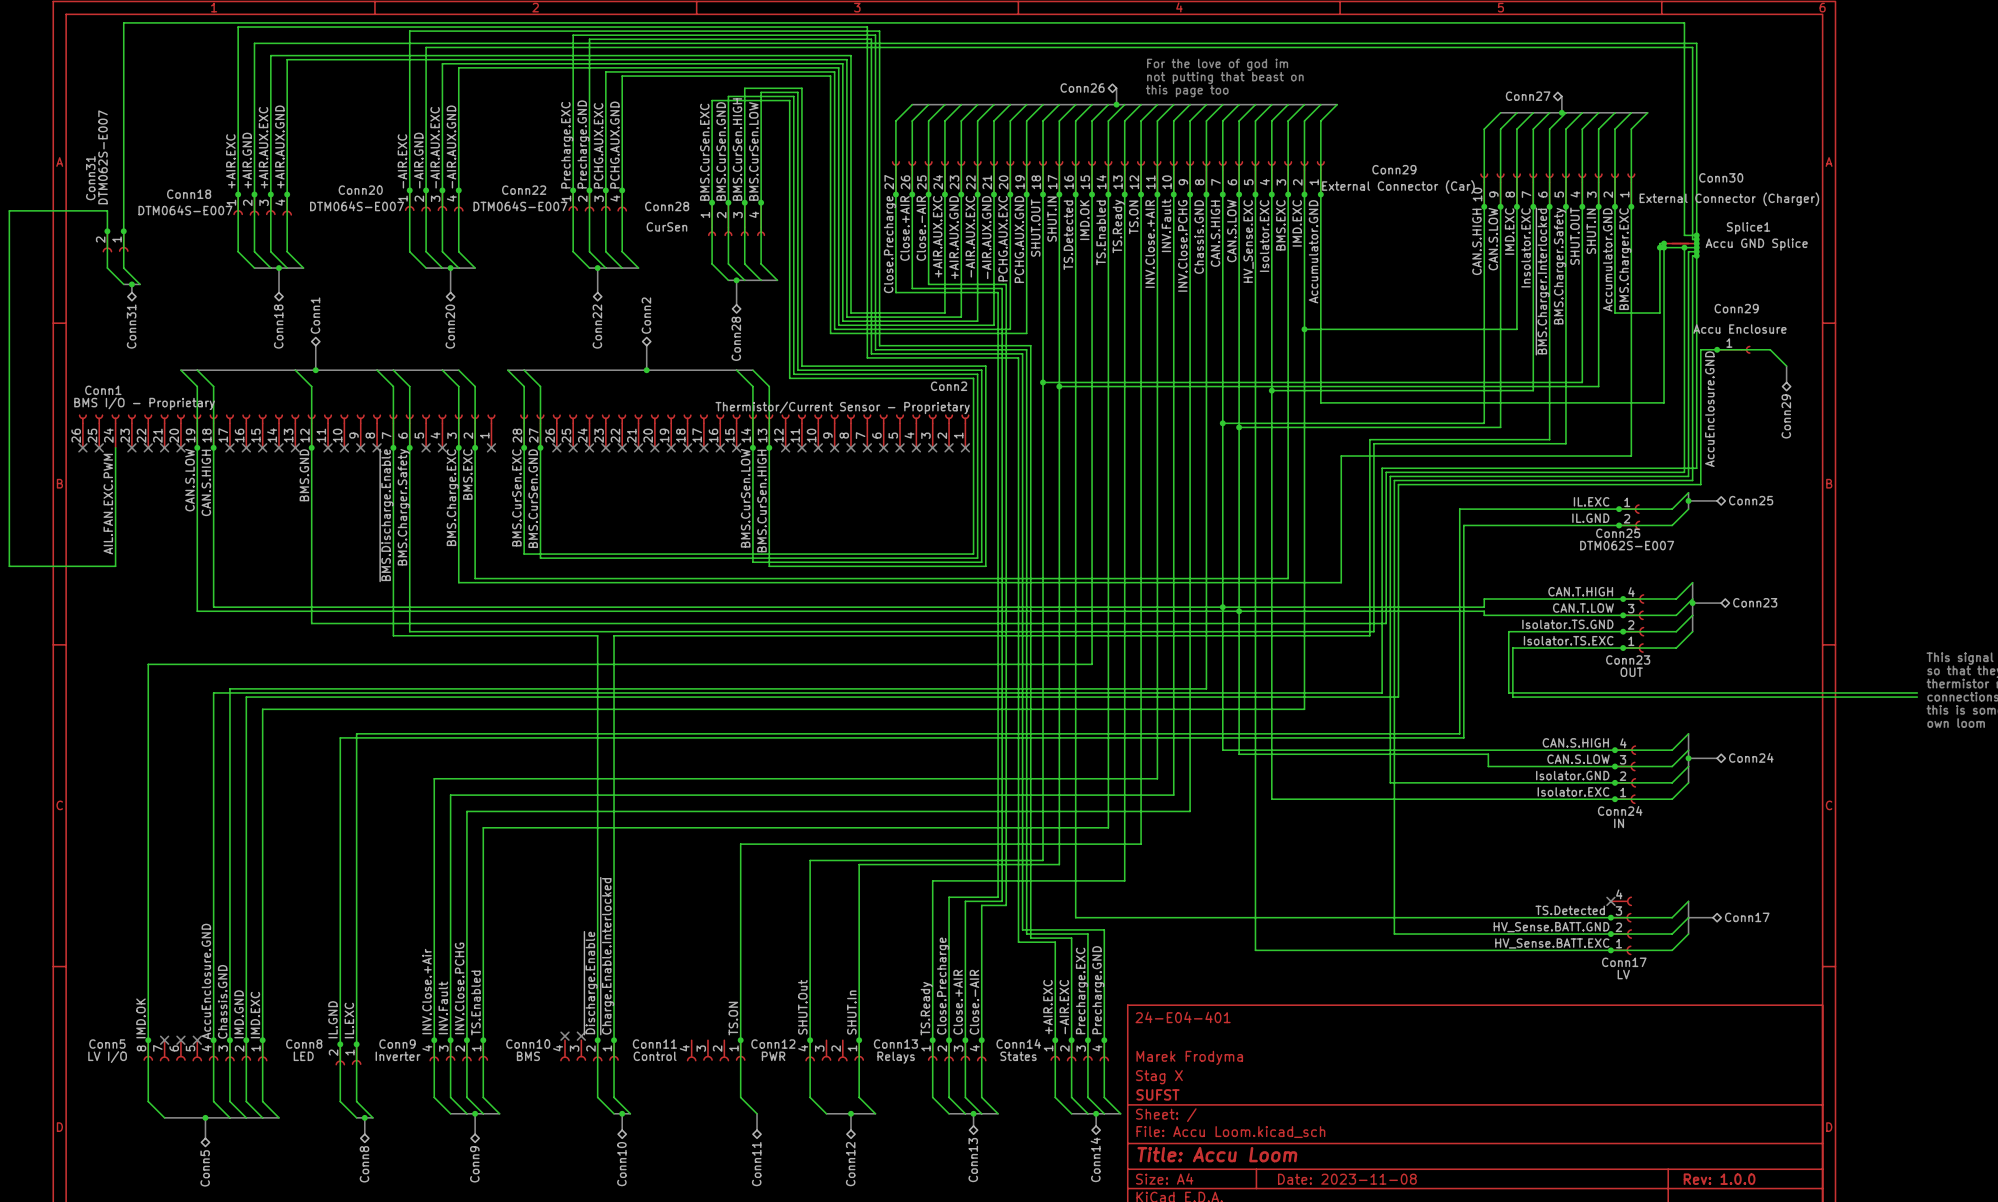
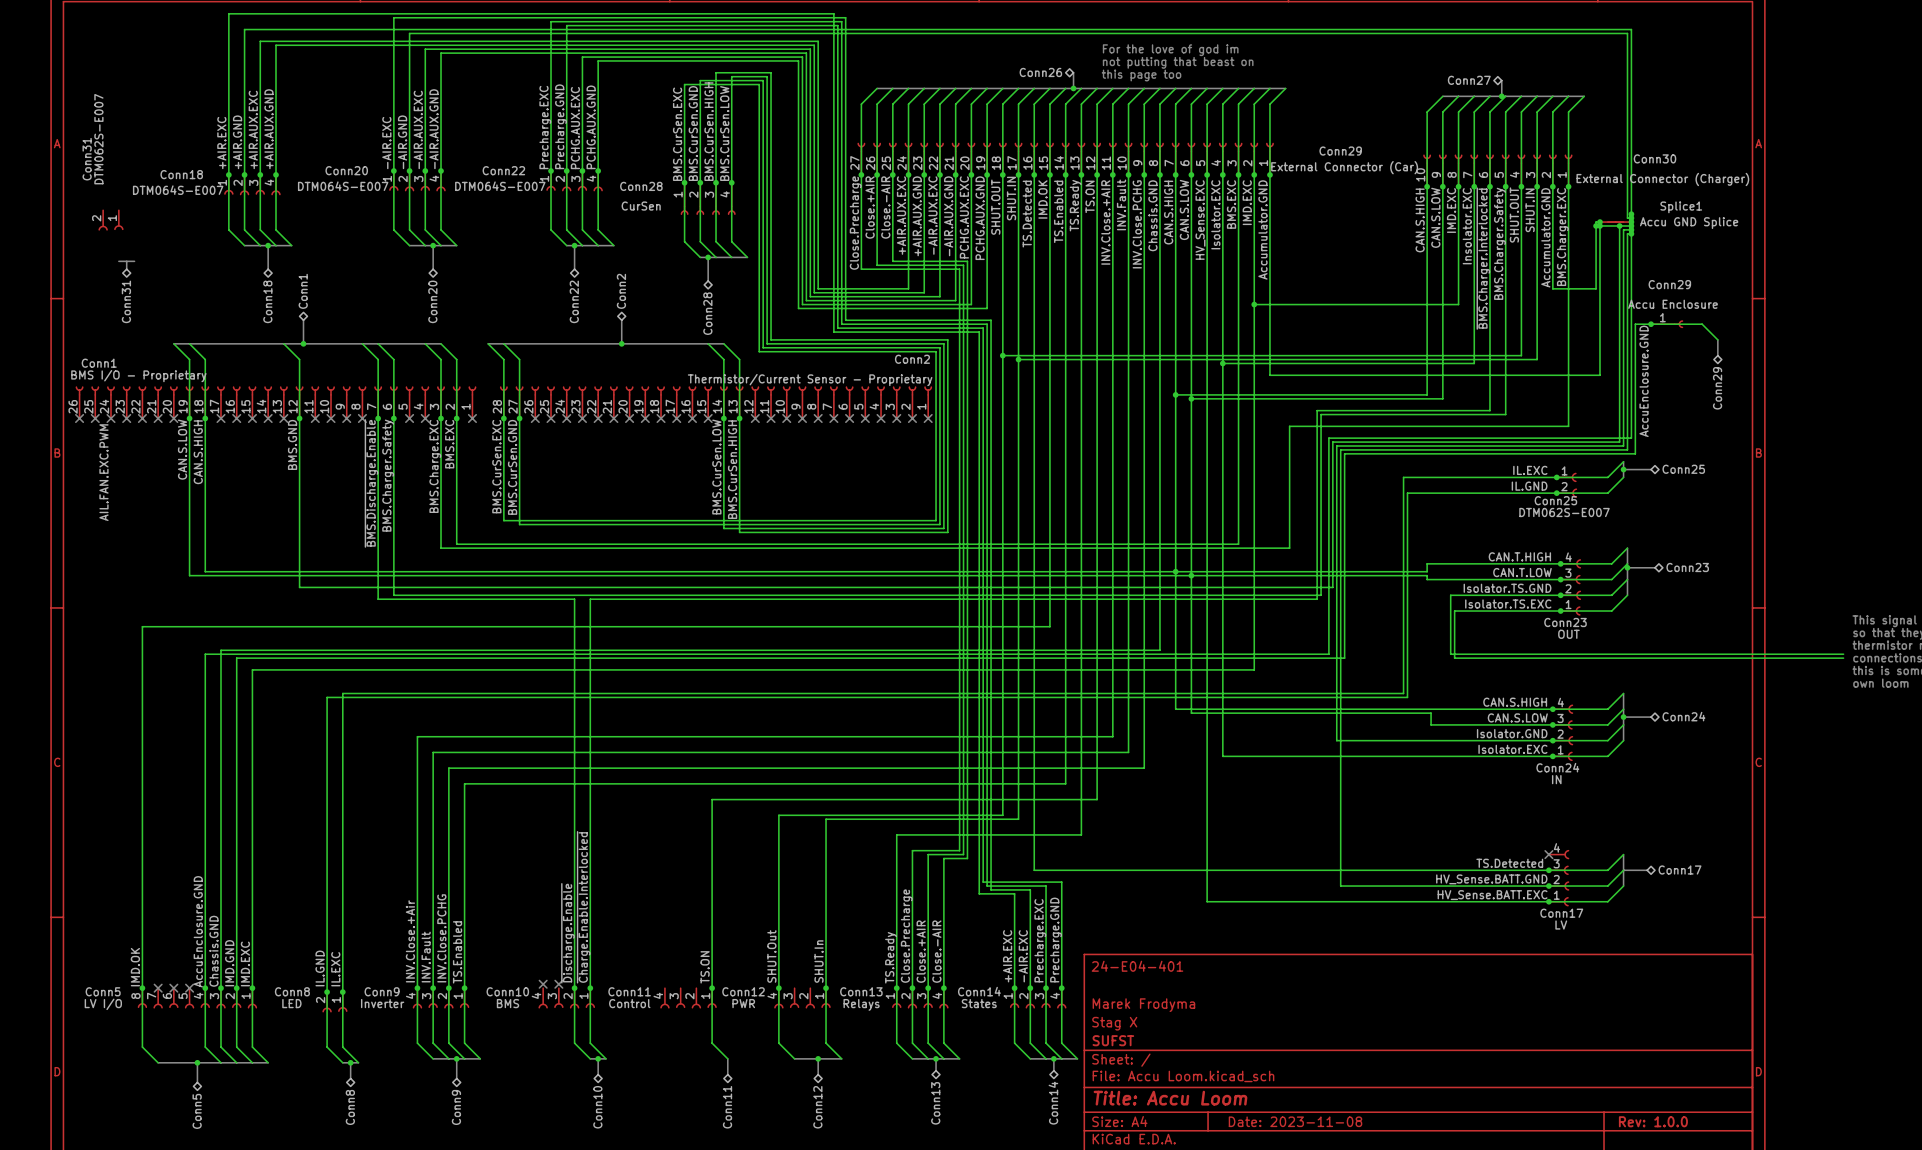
junction: (107, 231) -> none
junction: (123, 231) -> none
wire: (1696, 235) (1684, 235) (1684, 22) (123, 22) (123, 268) (140, 284) -> none
wire: (123, 284) (107, 268) (107, 210) (9, 210) (9, 566) (115, 566) (115, 447) -> none
junction: (131, 284) -> none
no-connect mark: none -> (110, 418)

